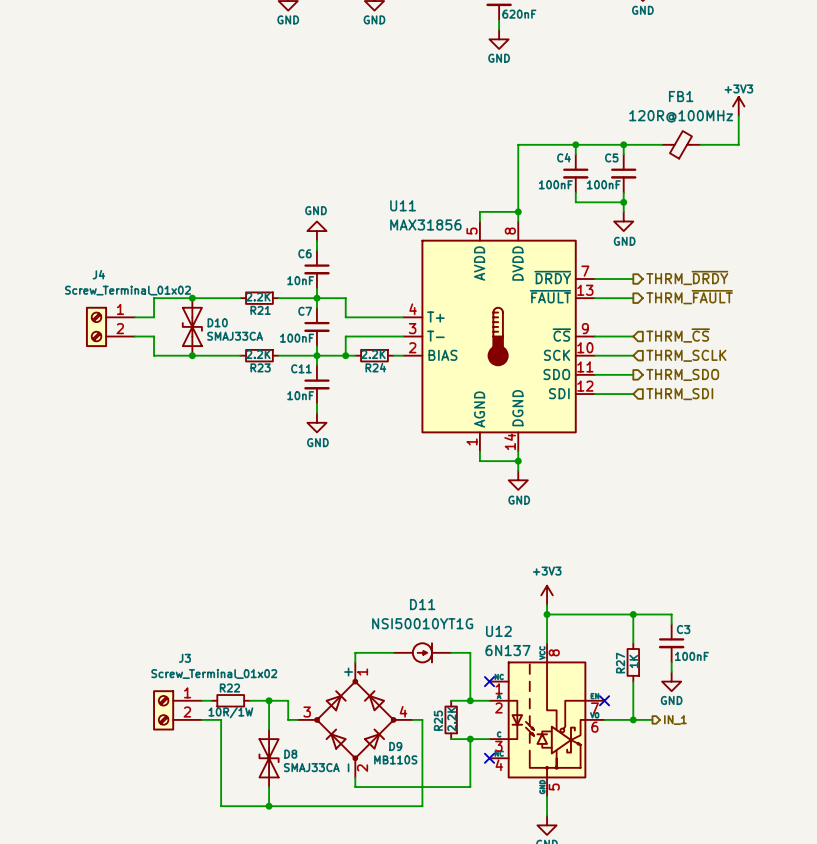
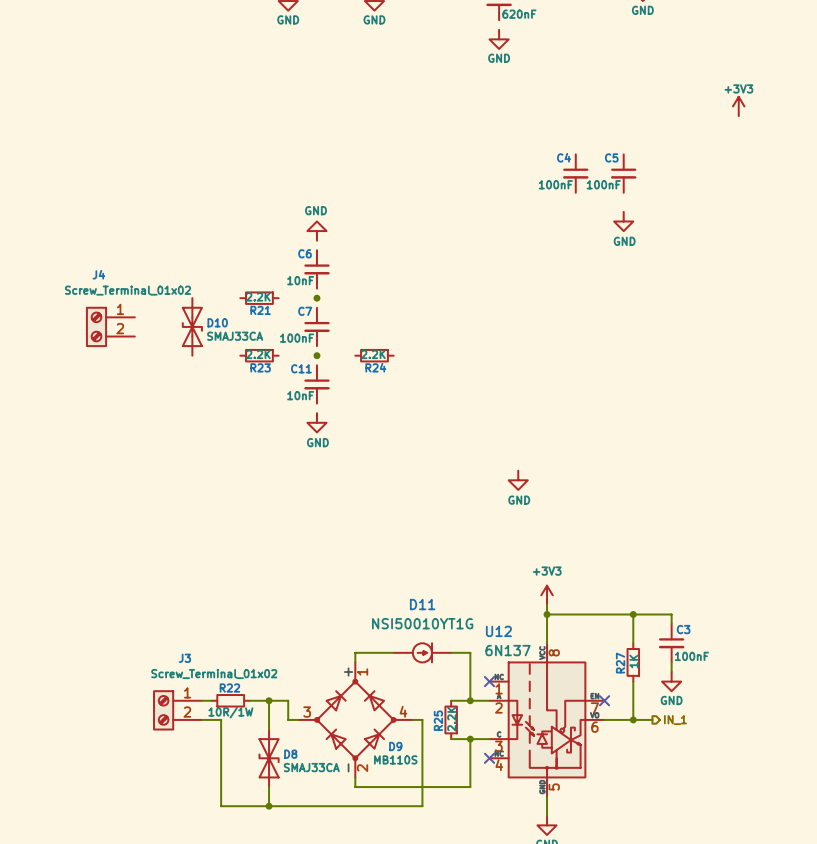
wire: (499, 20) (499, 29) -> none
wire: (738, 116) (738, 144) (700, 144) -> none
wire: (575, 144) (575, 154) -> none
junction: (575, 144) -> none
wire: (623, 144) (623, 154) -> none
junction: (623, 144) -> none
wire: (662, 144) (518, 144) (518, 221) -> none
FB1: 120R@100MHz (681, 144) -> none
wire: (575, 192) (575, 202) (623, 202) -> none
wire: (623, 192) (623, 211) -> none
junction: (623, 202) -> none
wire: (518, 211) (479, 211) (479, 221) -> none
junction: (518, 211) -> none
wire: (316, 240) (316, 250) -> none
hierarchical label: THRM_~{DRDY} (687, 278) -> none
wire: (594, 279) (633, 279) -> none
wire: (316, 288) (316, 307) -> none
hierarchical label: THRM_~{FAULT} (689, 297) -> none
junction: (192, 298) -> none
wire: (240, 298) (154, 298) (154, 317) (134, 317) -> none
wire: (278, 298) (345, 298) (345, 317) (403, 317) -> none
wire: (594, 298) (633, 298) -> none
hierarchical label: THRM_~{CS} (678, 335) -> none
wire: (134, 336) (154, 336) (154, 355) (240, 355) -> none
wire: (403, 336) (345, 336) (345, 355) -> none
U11: MAX31856 (499, 336) -> none
wire: (594, 336) (633, 336) -> none
wire: (316, 346) (316, 365) -> none
junction: (192, 355) -> none
wire: (278, 355) (355, 355) -> none
junction: (345, 355) -> none
wire: (393, 355) (403, 355) -> none
wire: (594, 355) (633, 355) -> none
hierarchical label: THRM_SCLK (686, 355) -> none
wire: (594, 374) (633, 374) -> none
hierarchical label: THRM_SDO (682, 374) -> none
wire: (594, 394) (633, 394) -> none
hierarchical label: THRM_SDI (679, 394) -> none
wire: (316, 403) (316, 413) -> none
wire: (479, 451) (479, 461) (518, 461) -> none
wire: (518, 451) (518, 470) -> none
junction: (518, 461) -> none

